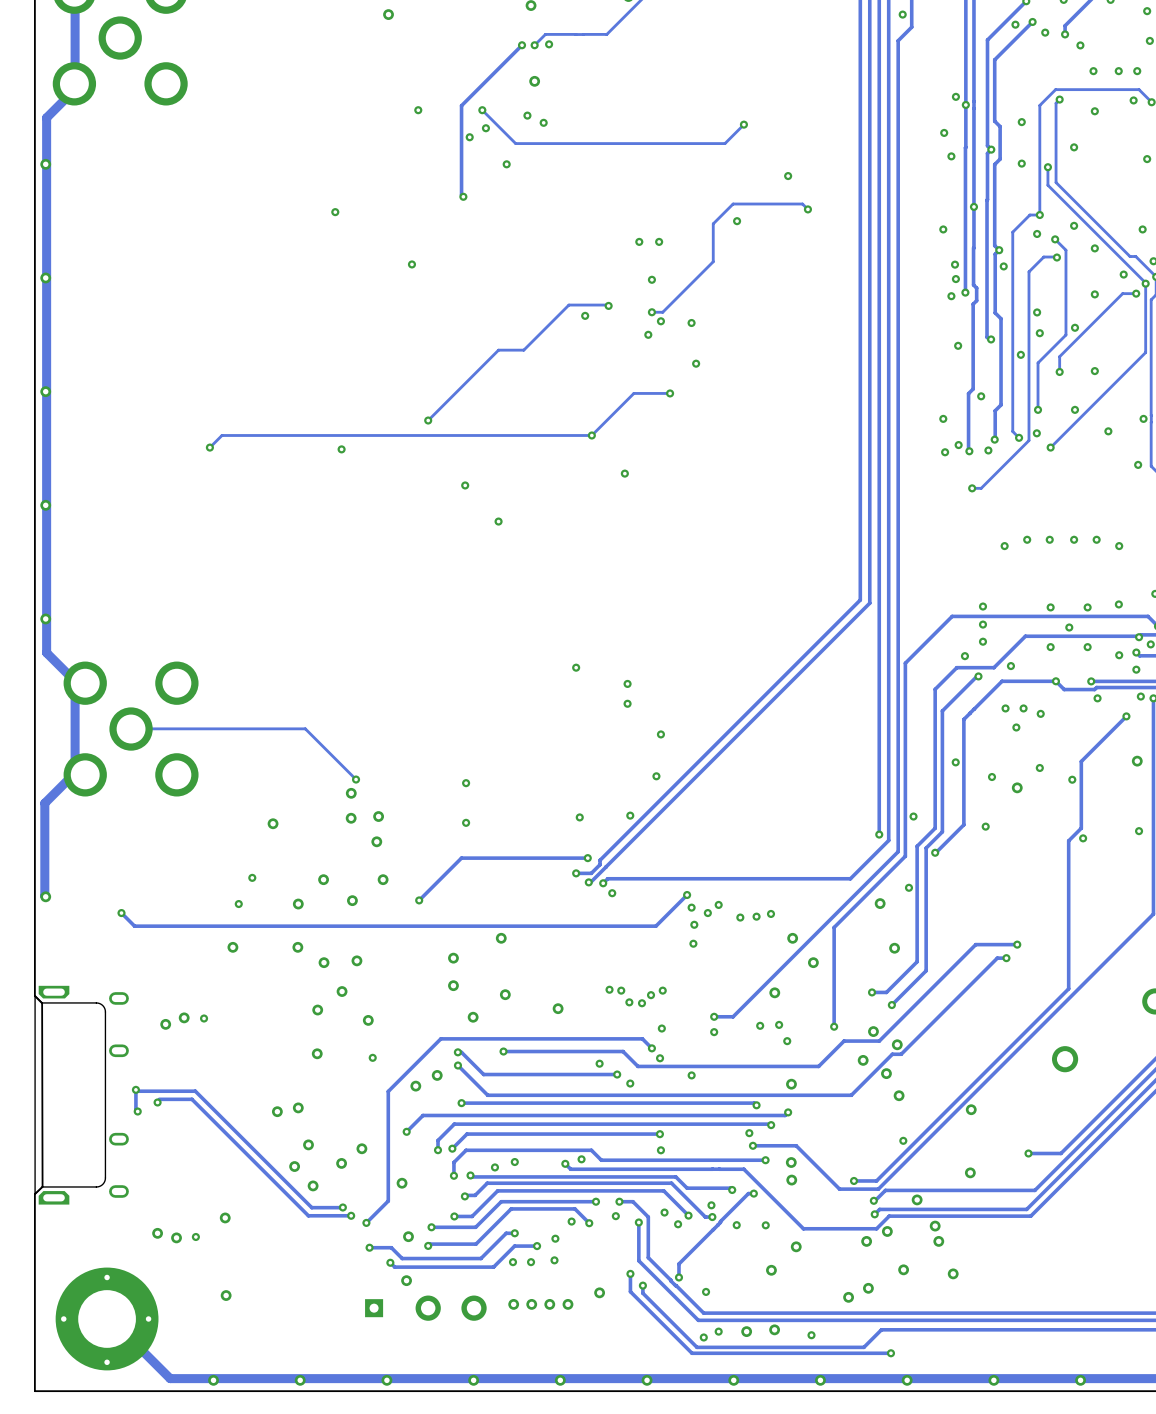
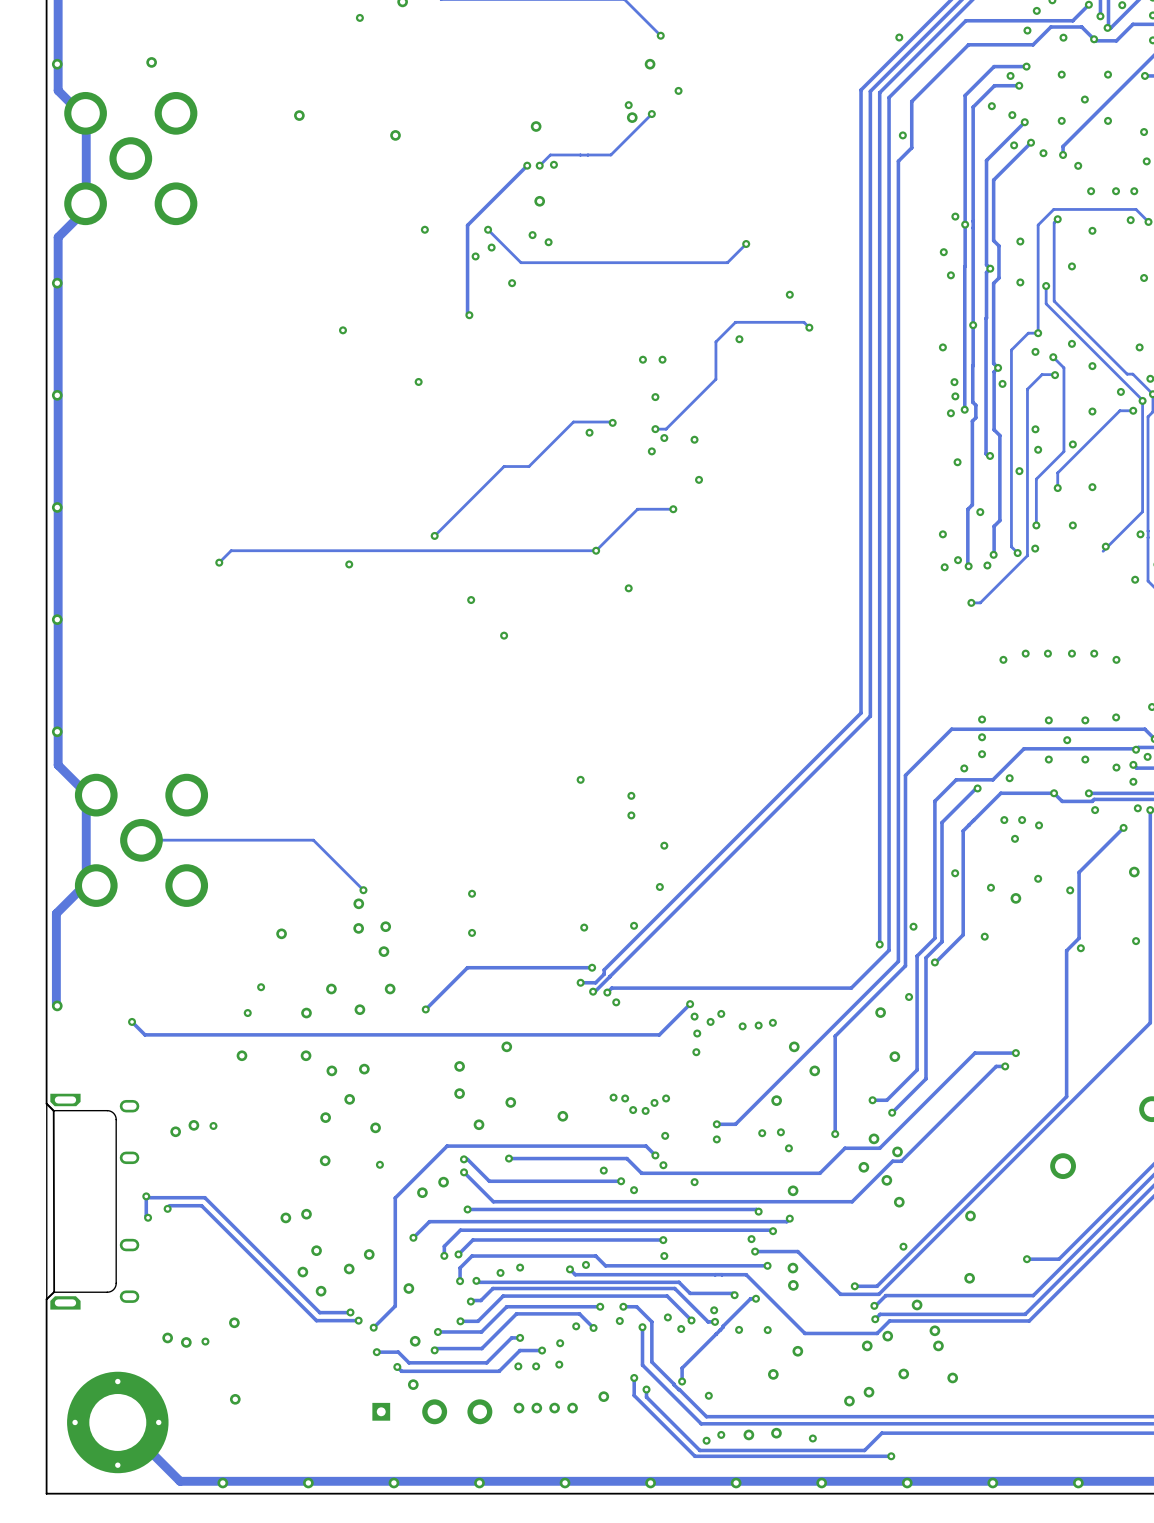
track: (1145, 352) (1050, 447) -> (1142, 468) (1142, 511) (1103, 551)
via: (1050, 447) -> none

